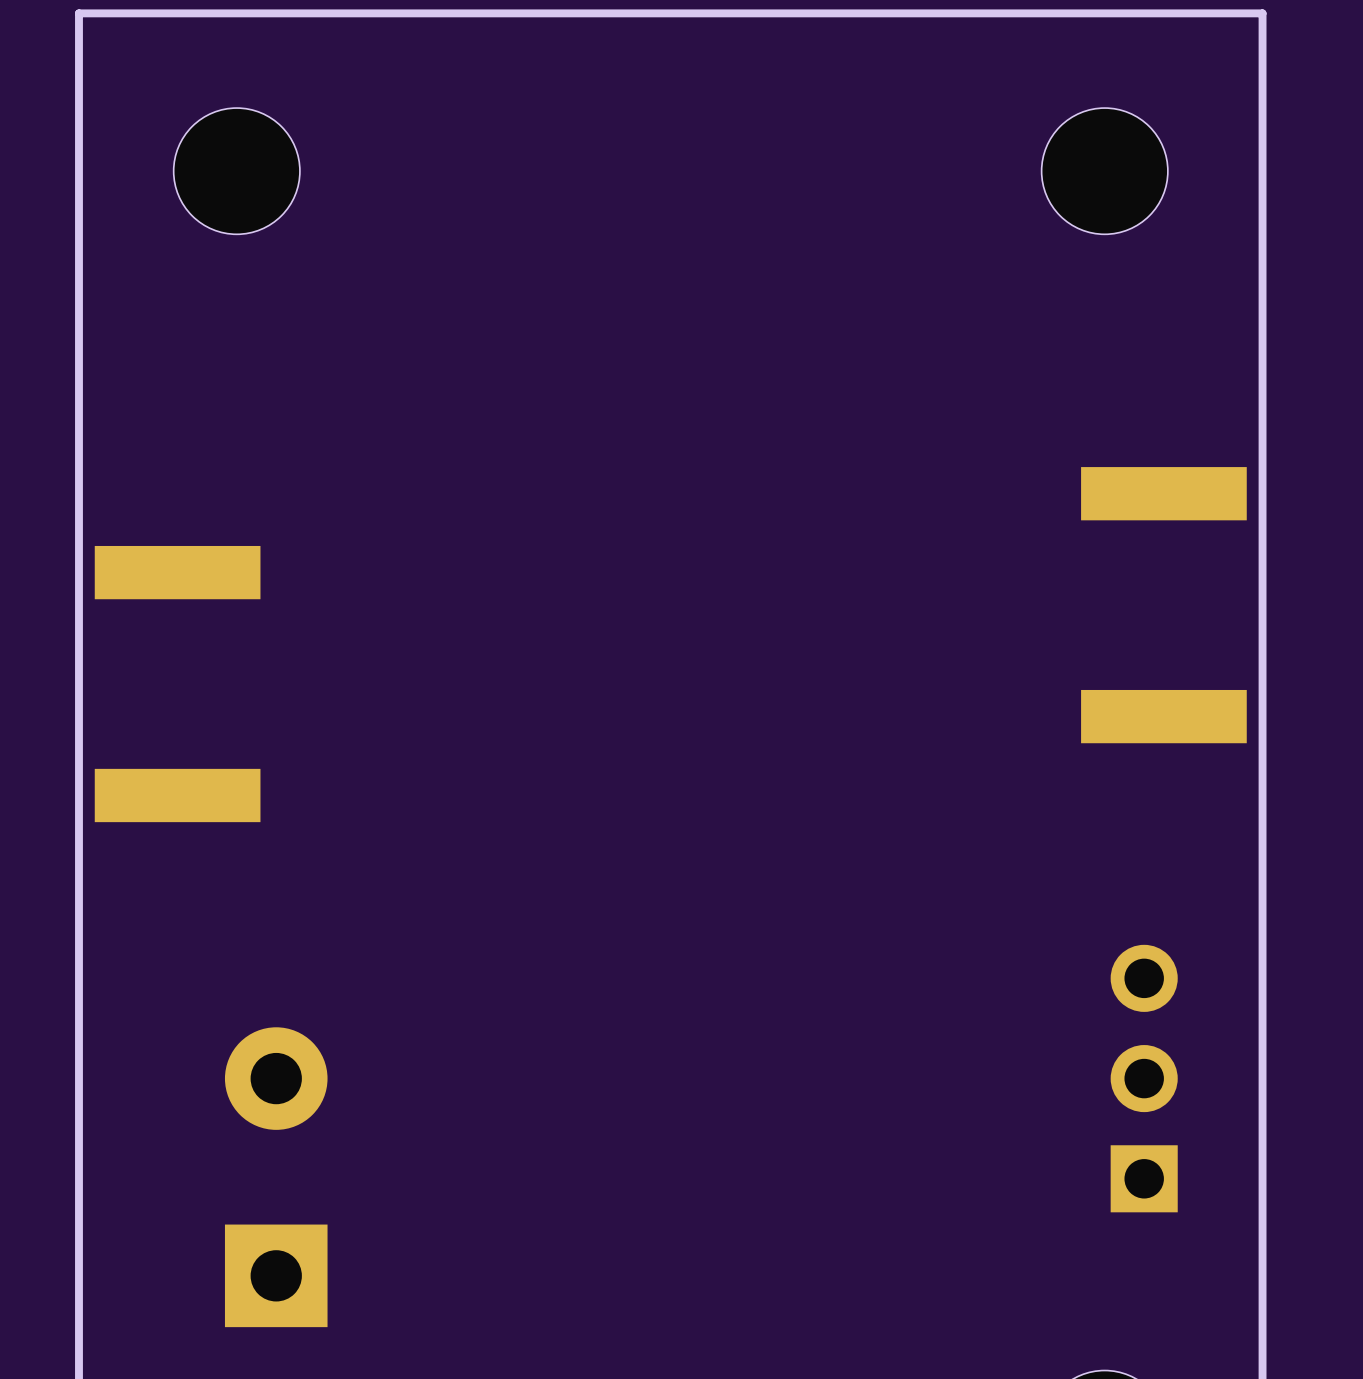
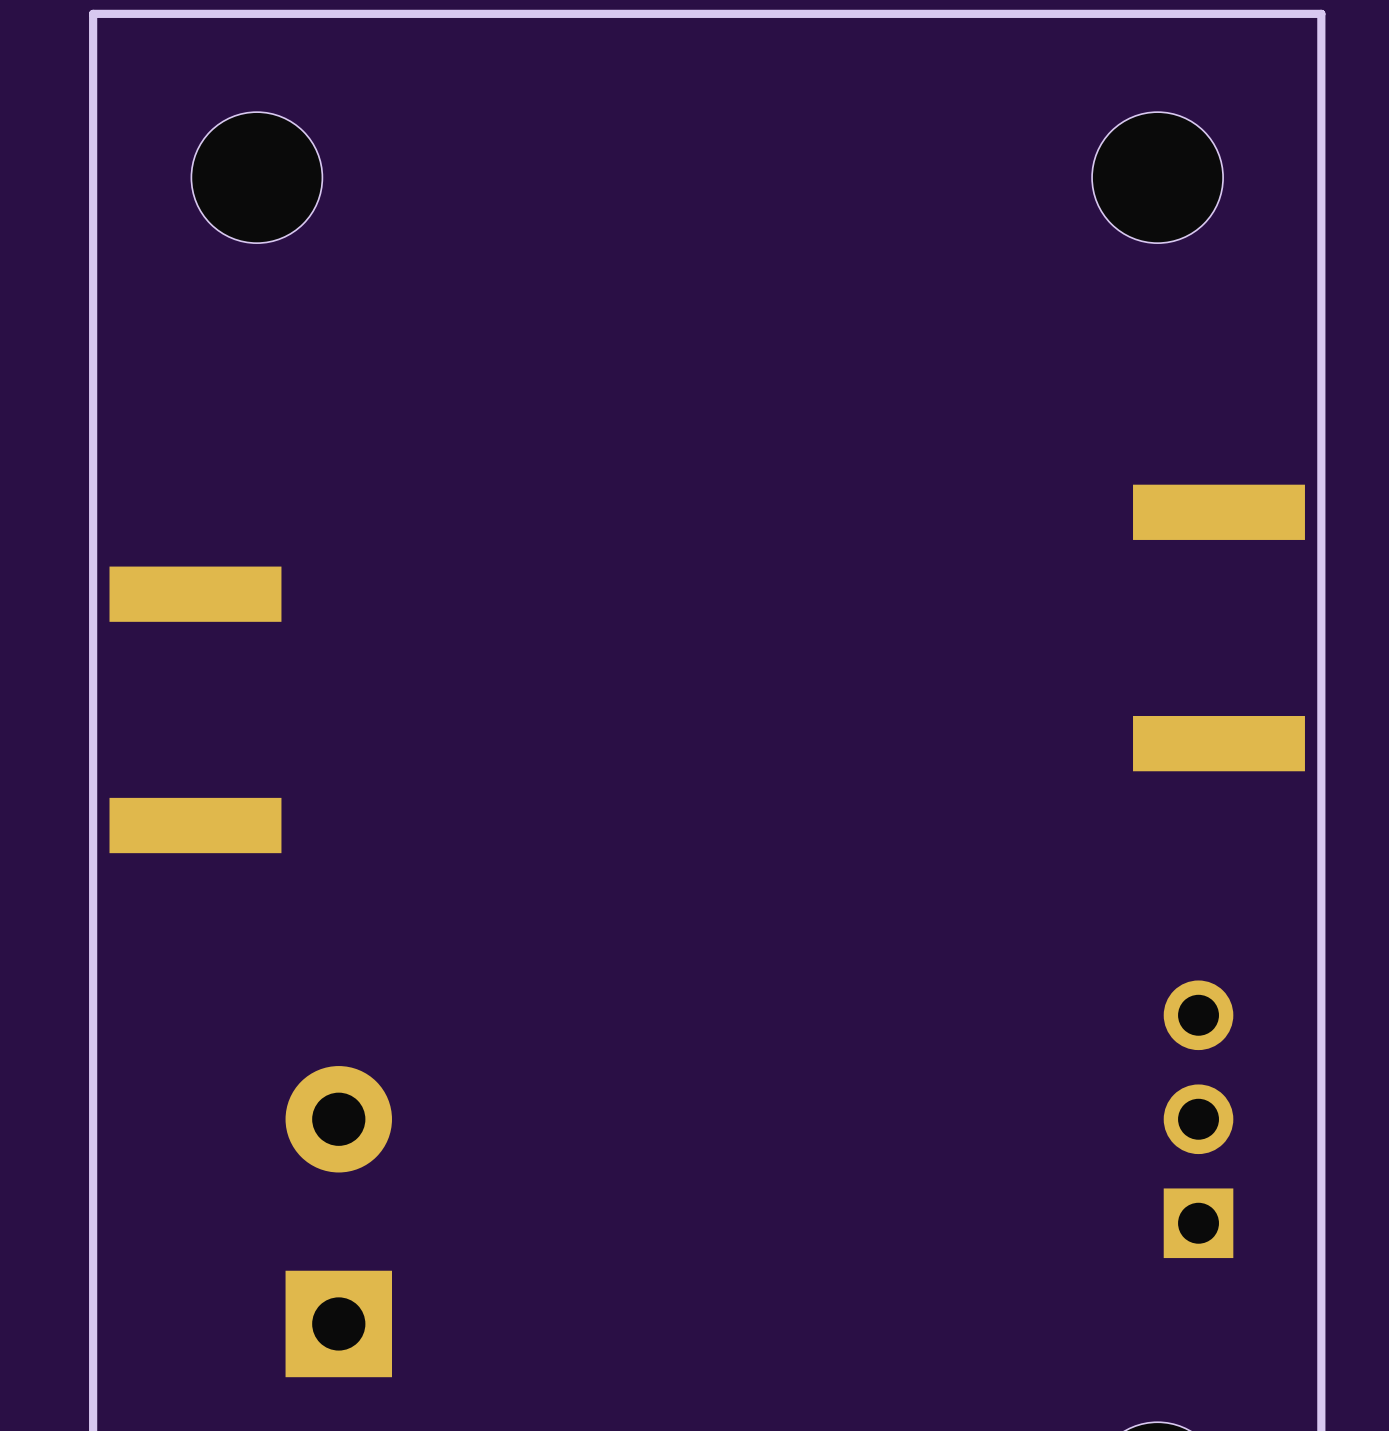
part position: (276, 1177) -> (338, 1221)

